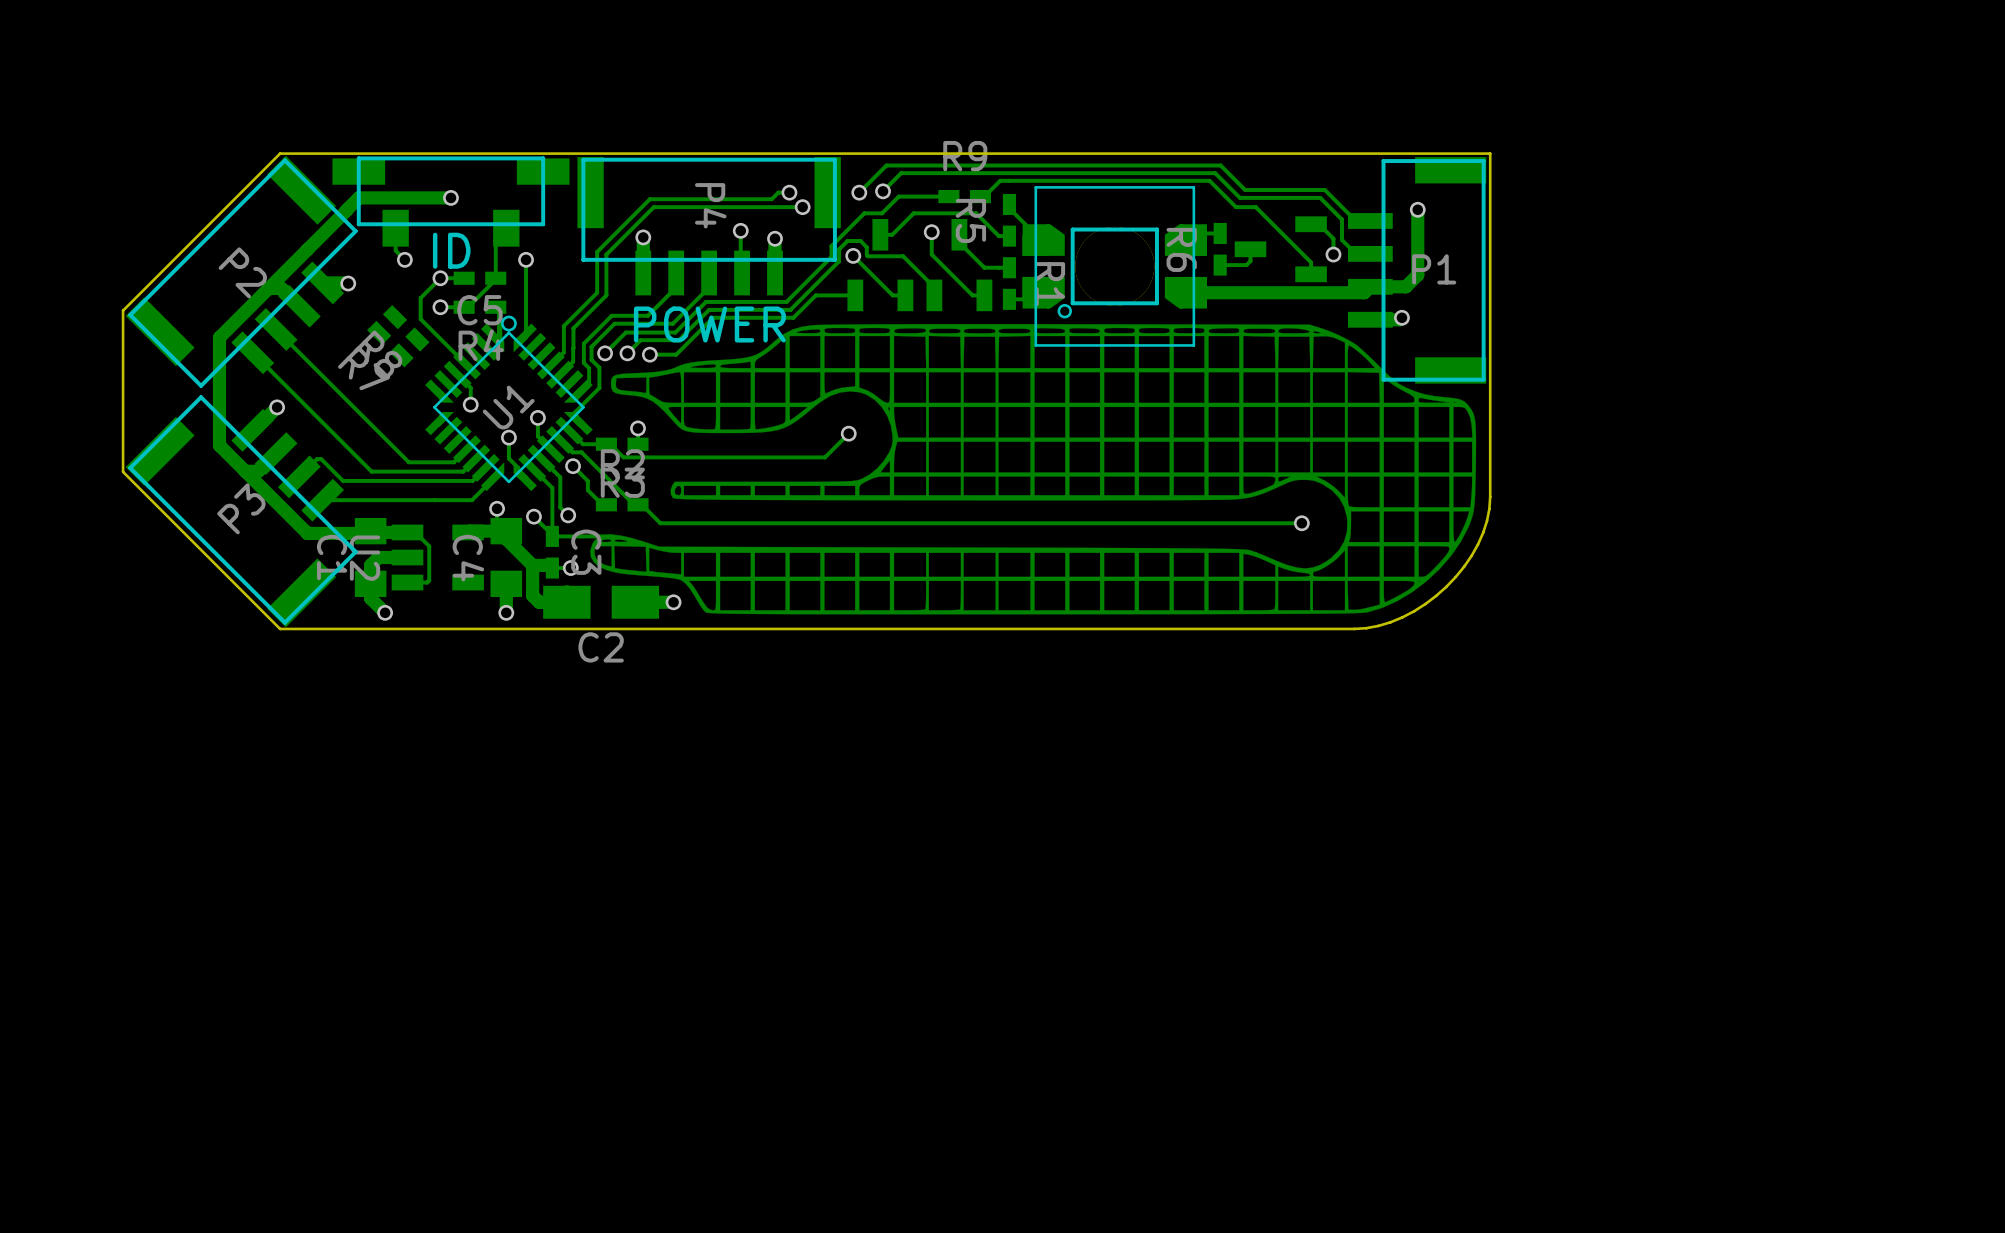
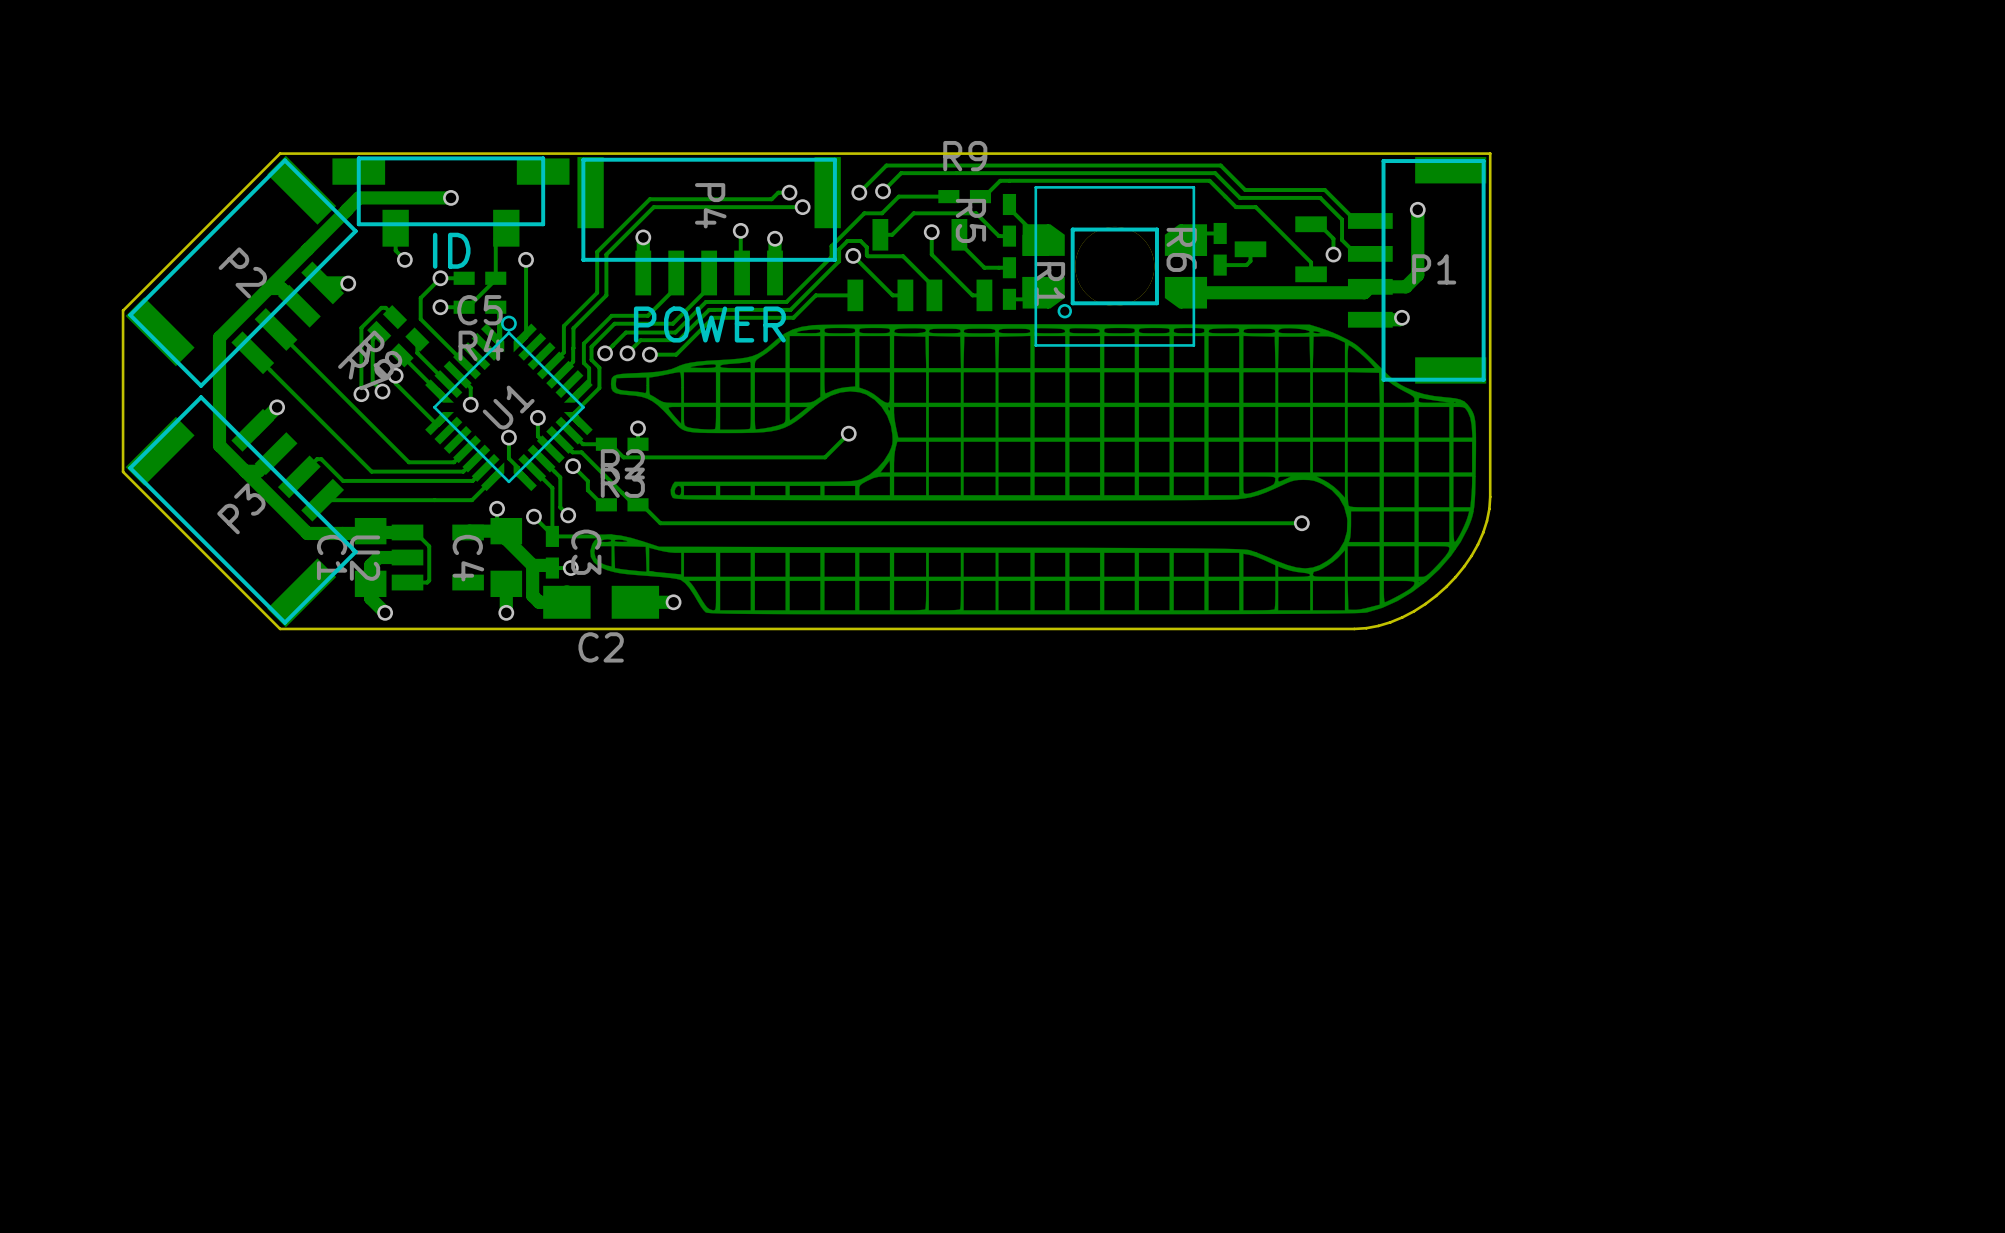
track: none -> (395, 317) (385, 307) (381, 307) (361, 327) (361, 394)
track: none -> (379, 332) (372, 339) (372, 381) (382, 391)
track: none -> (417, 339) (417, 353) (448, 384)
track: none -> (401, 355) (443, 398)
track: none -> (395, 375) (395, 383) (436, 424)
via: none -> (395, 375)
via: none -> (382, 391)
via: none -> (361, 394)

